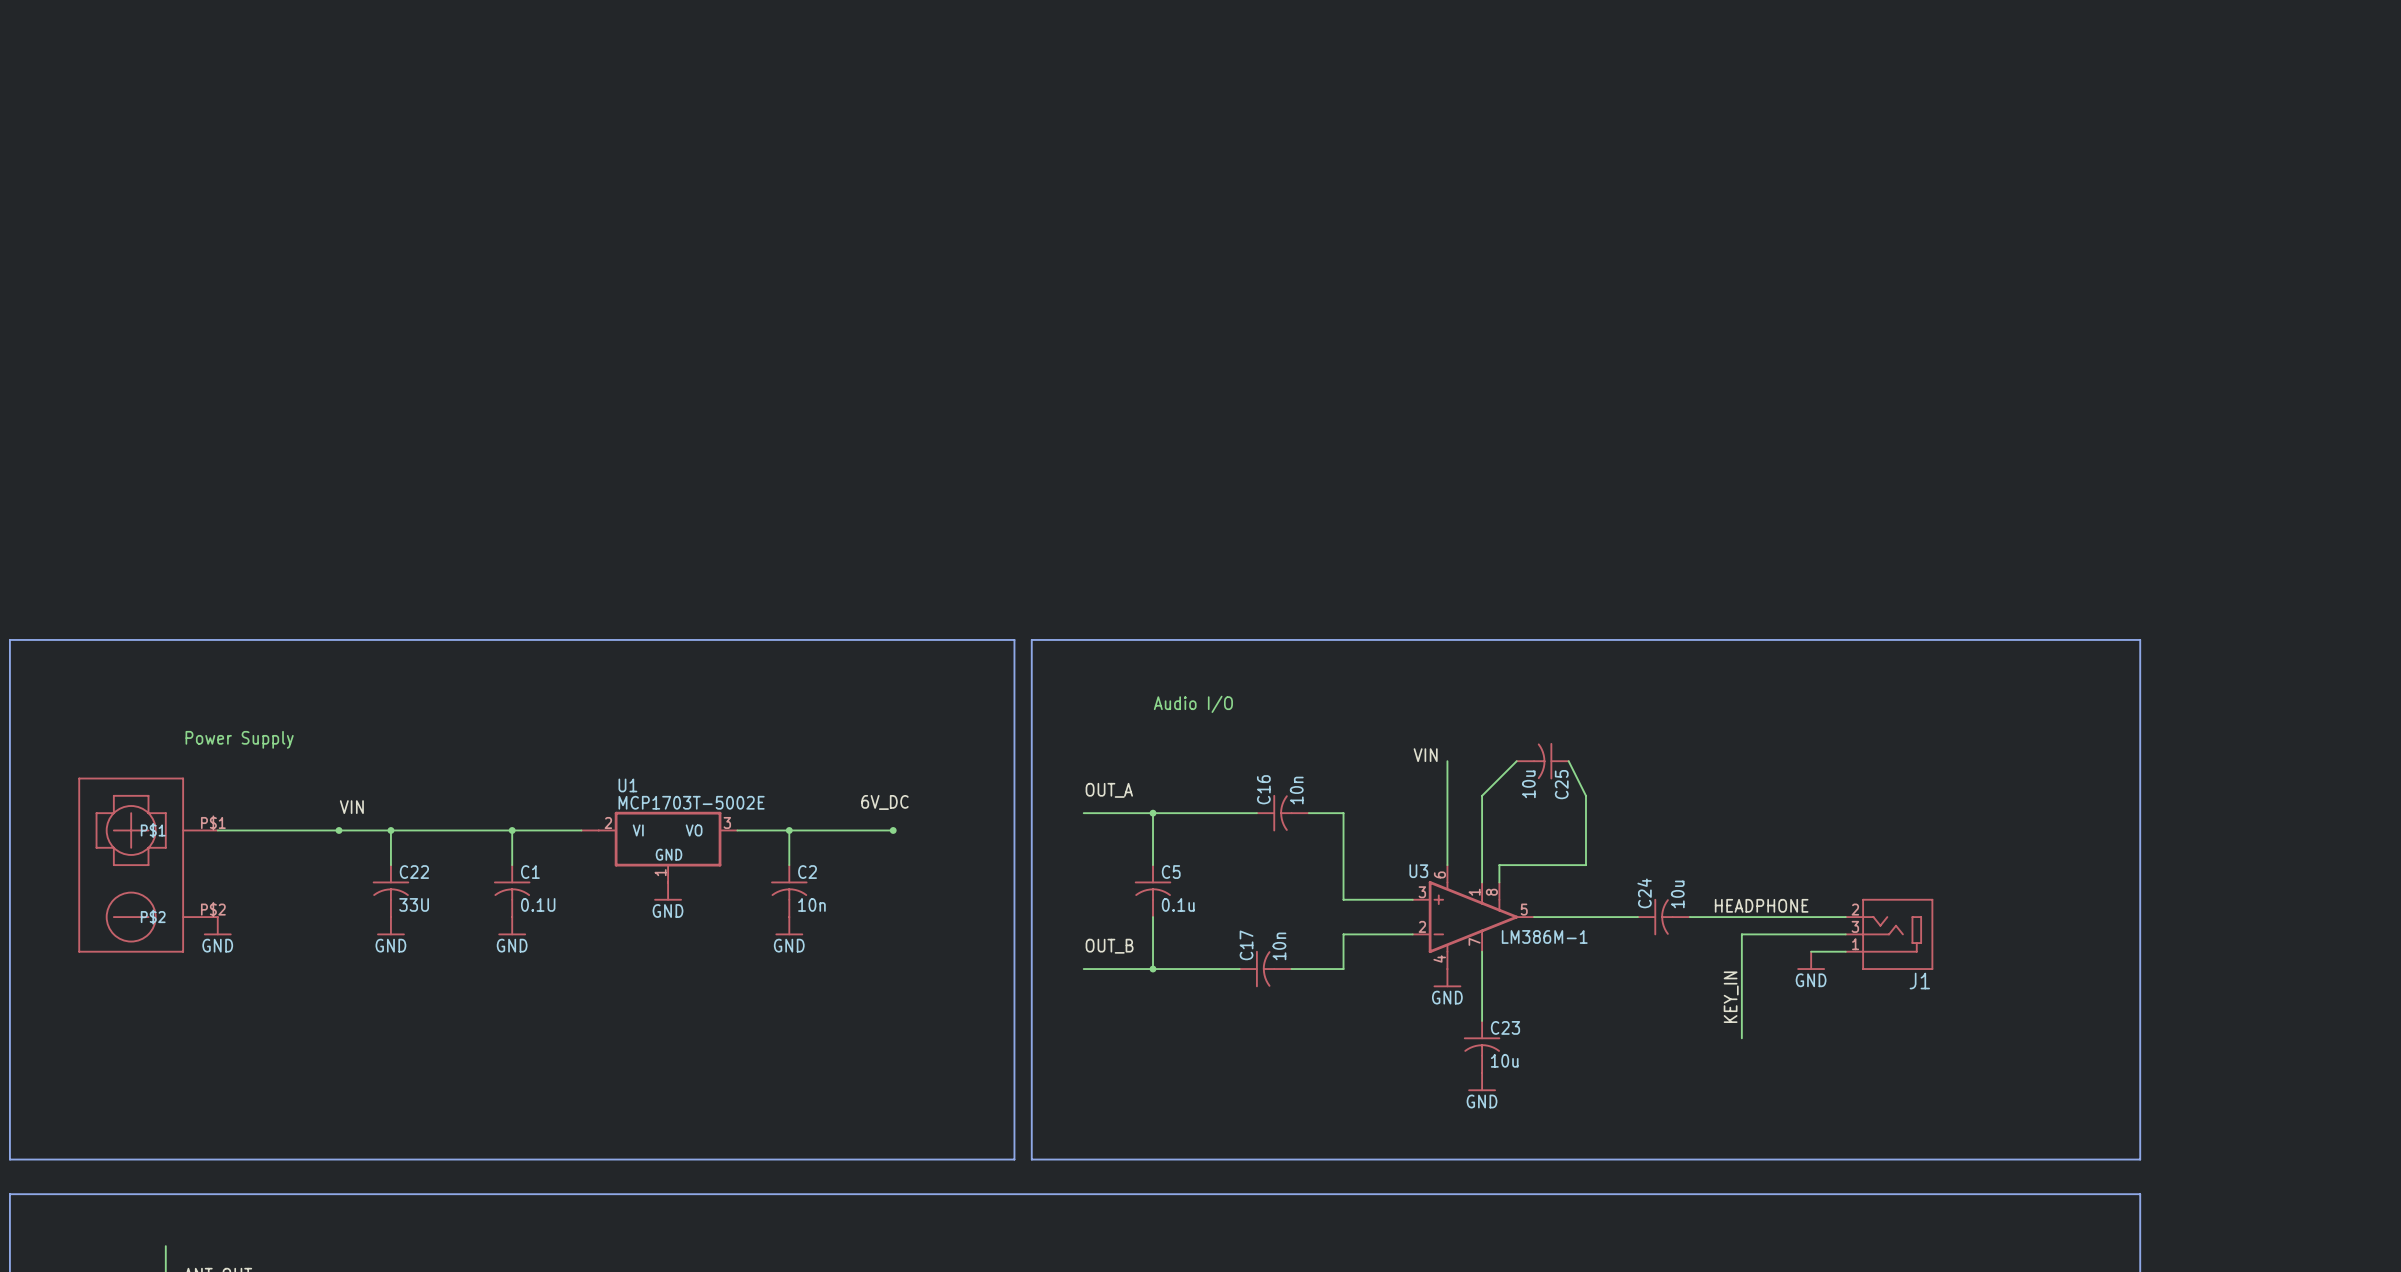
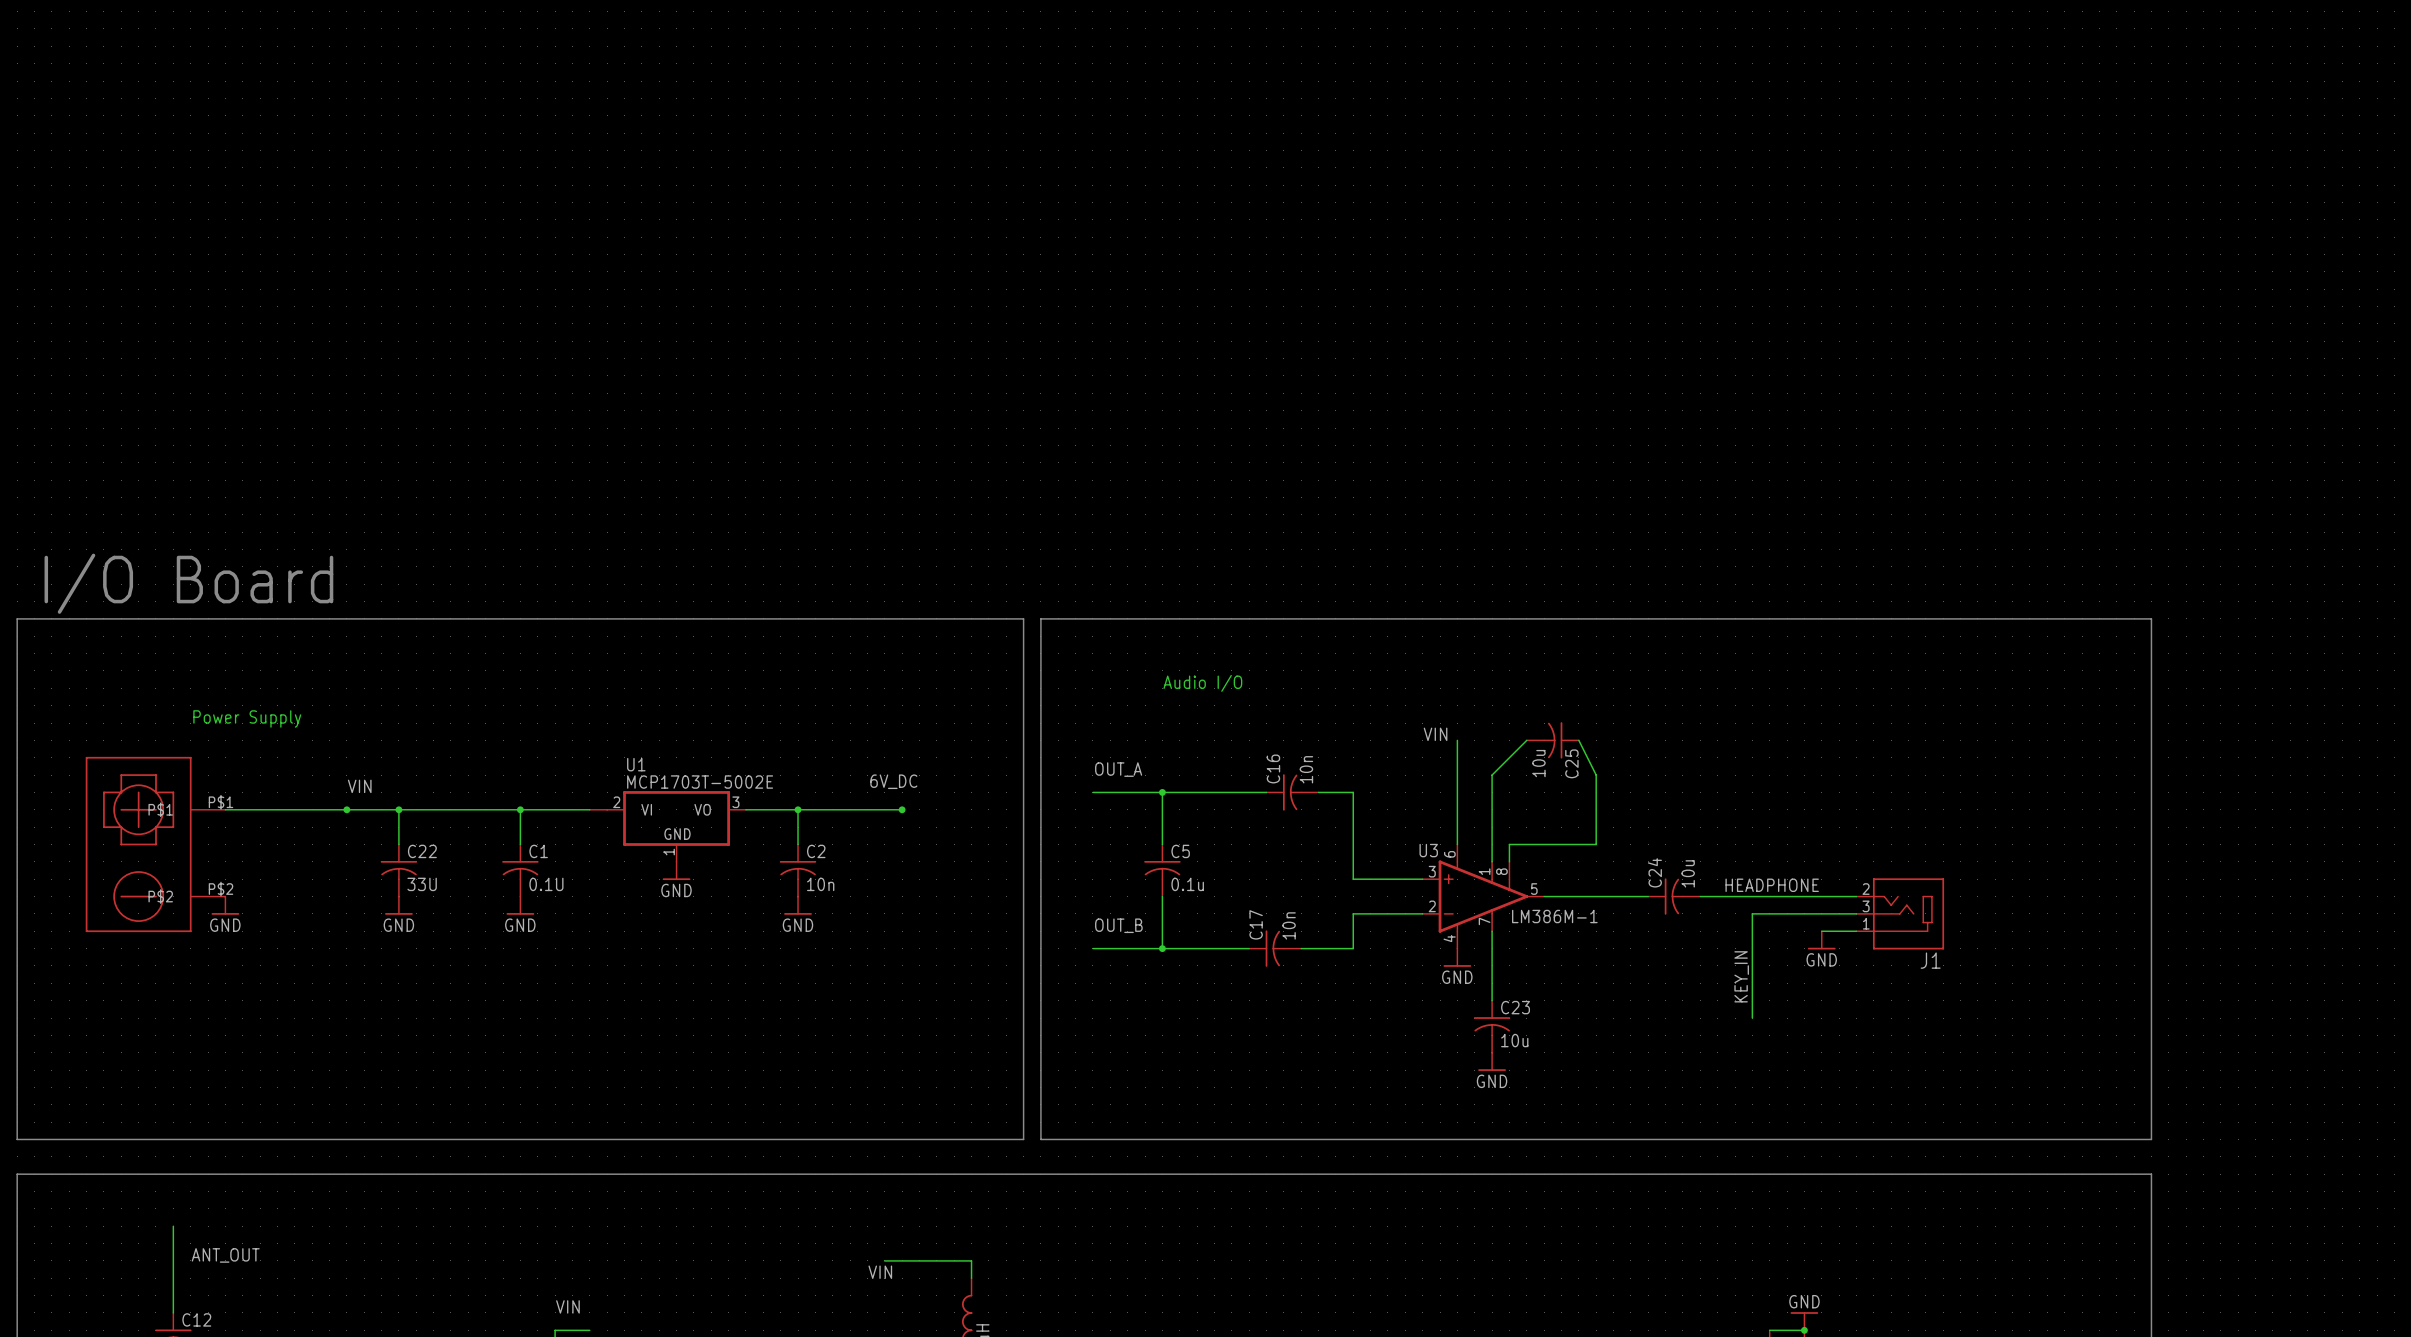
text: none -> I/O Board (188, 583)

